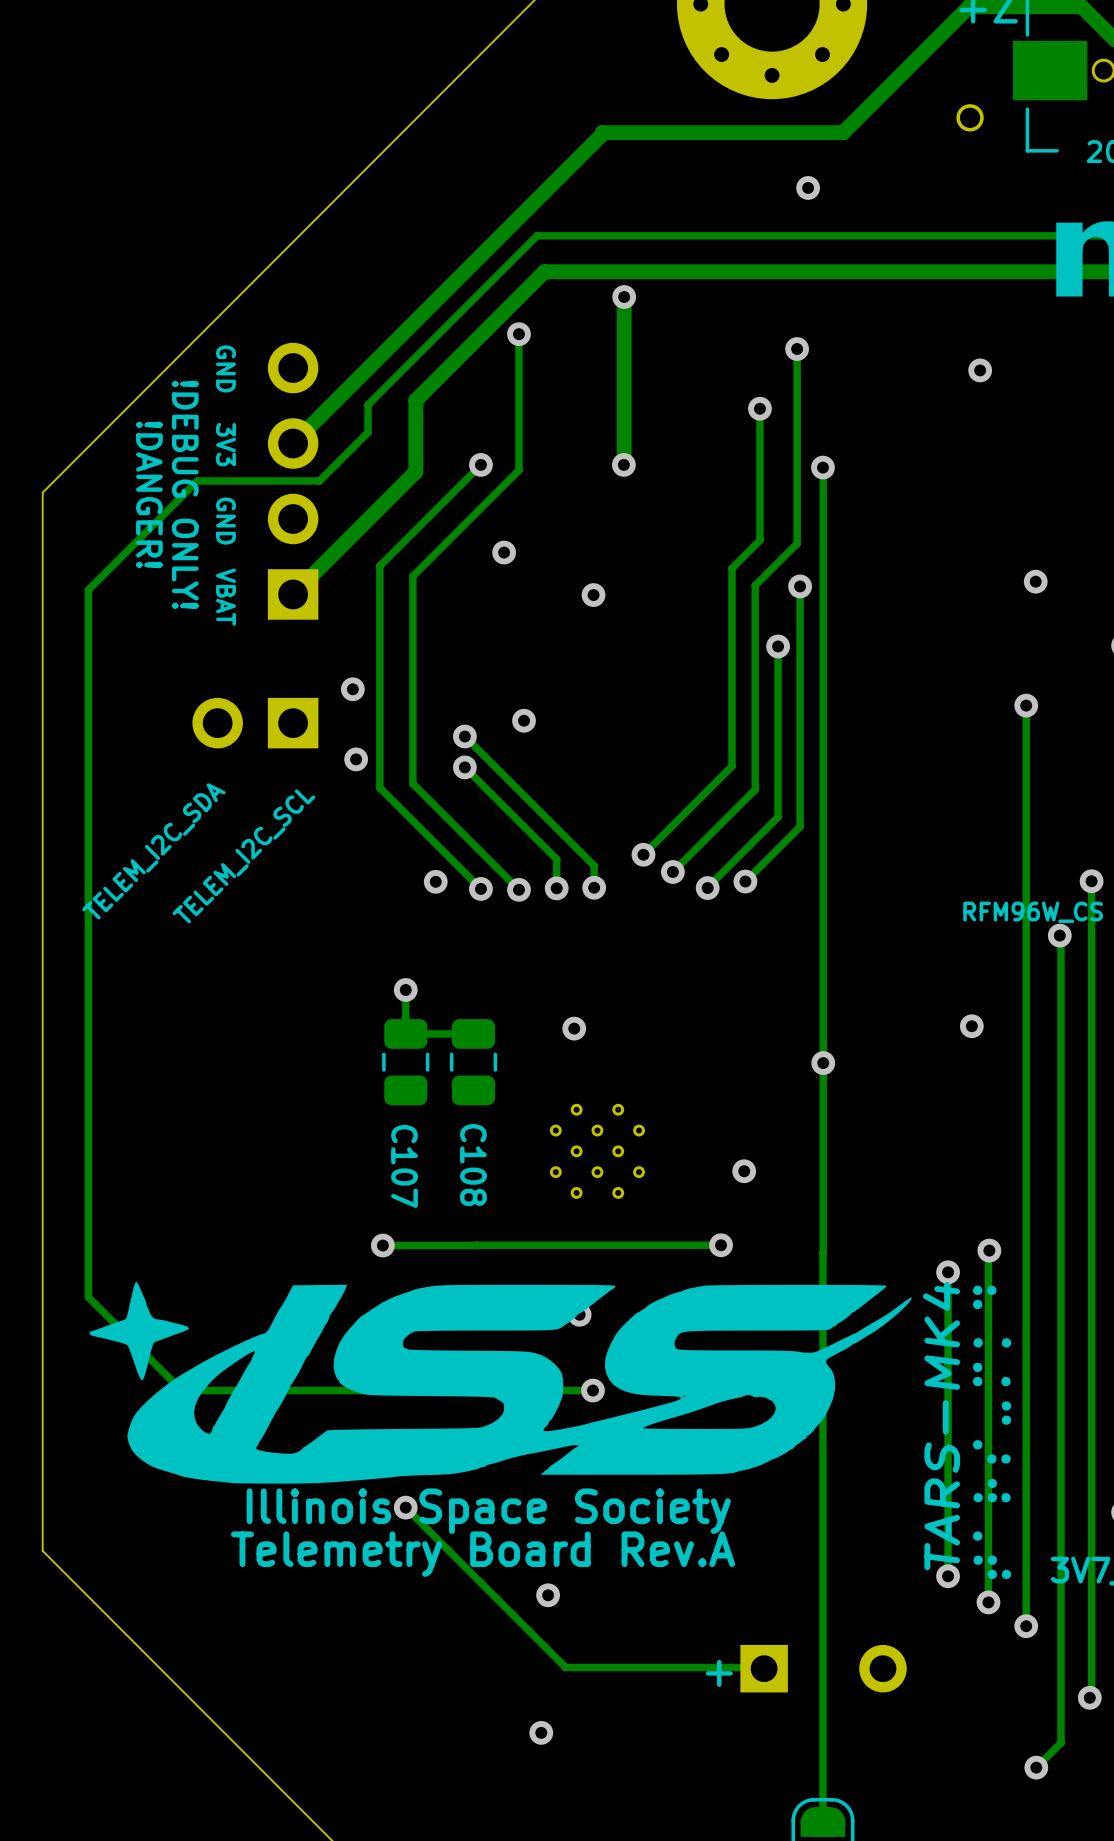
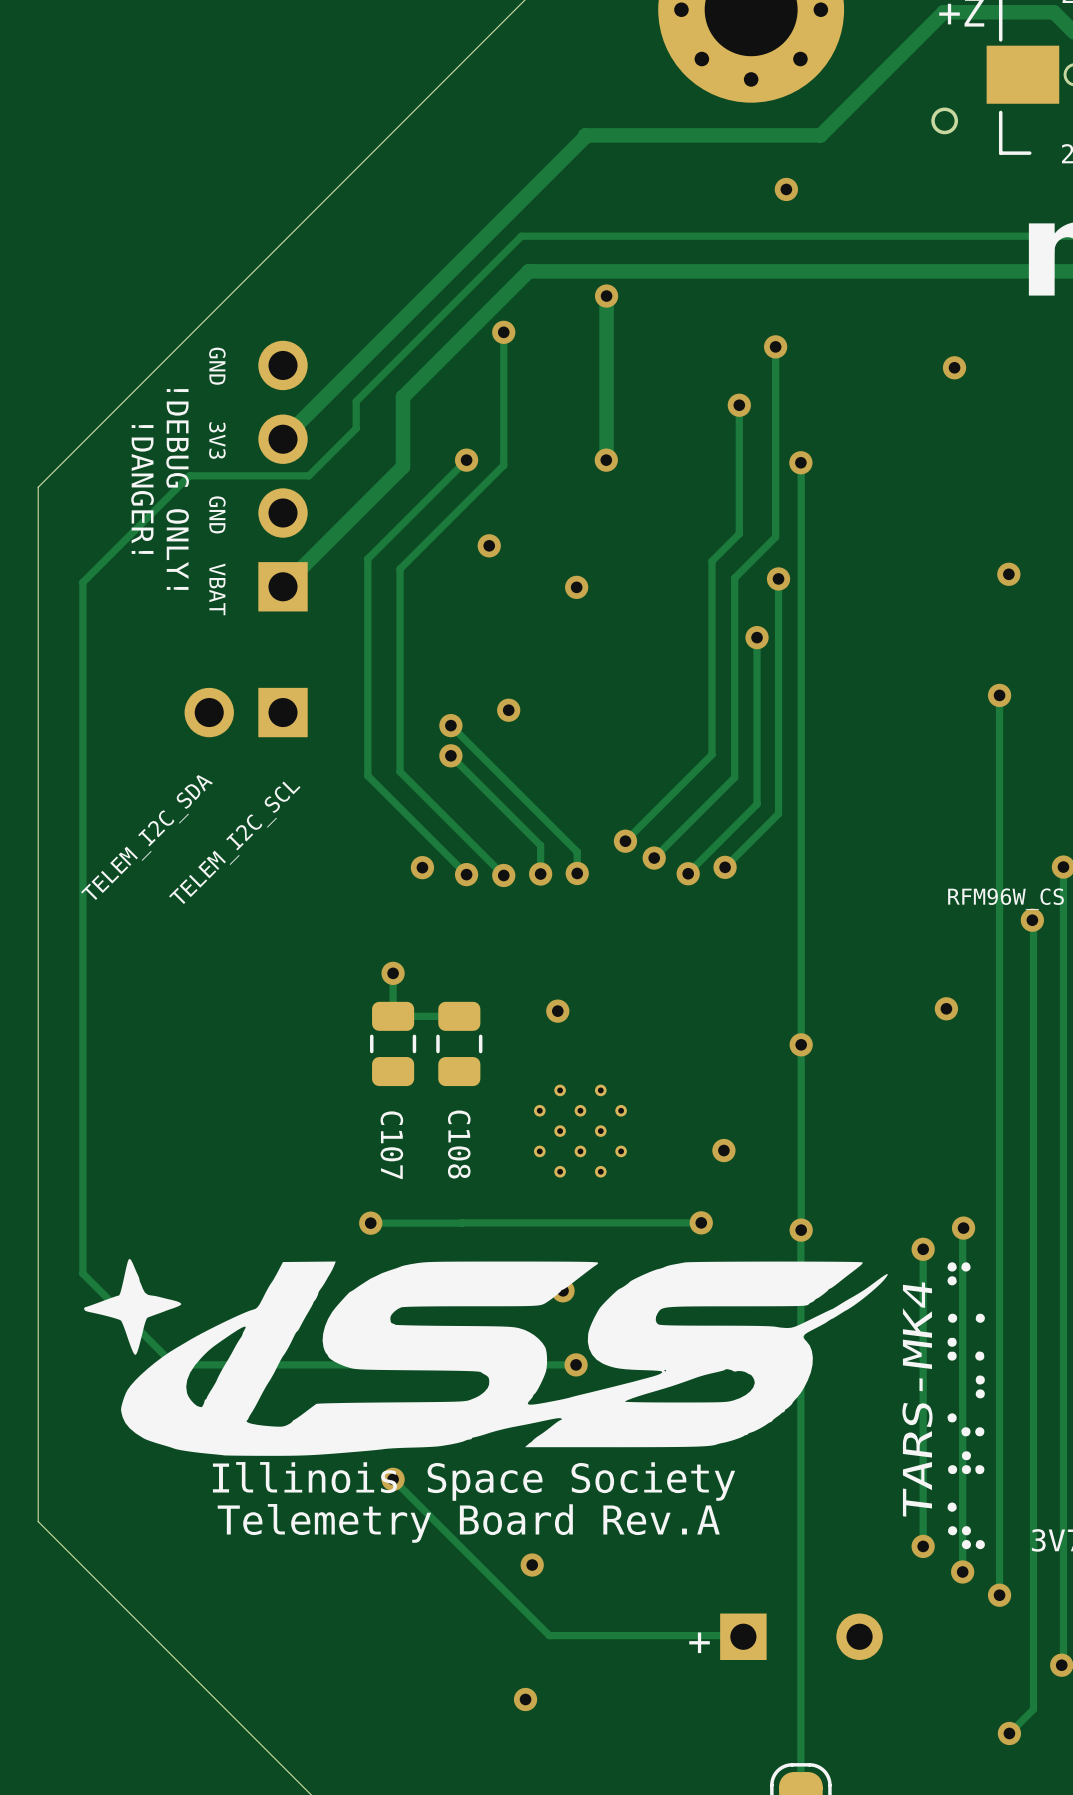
via: (352, 689) -> none
via: (356, 759) -> none
via: none -> (801, 1230)

